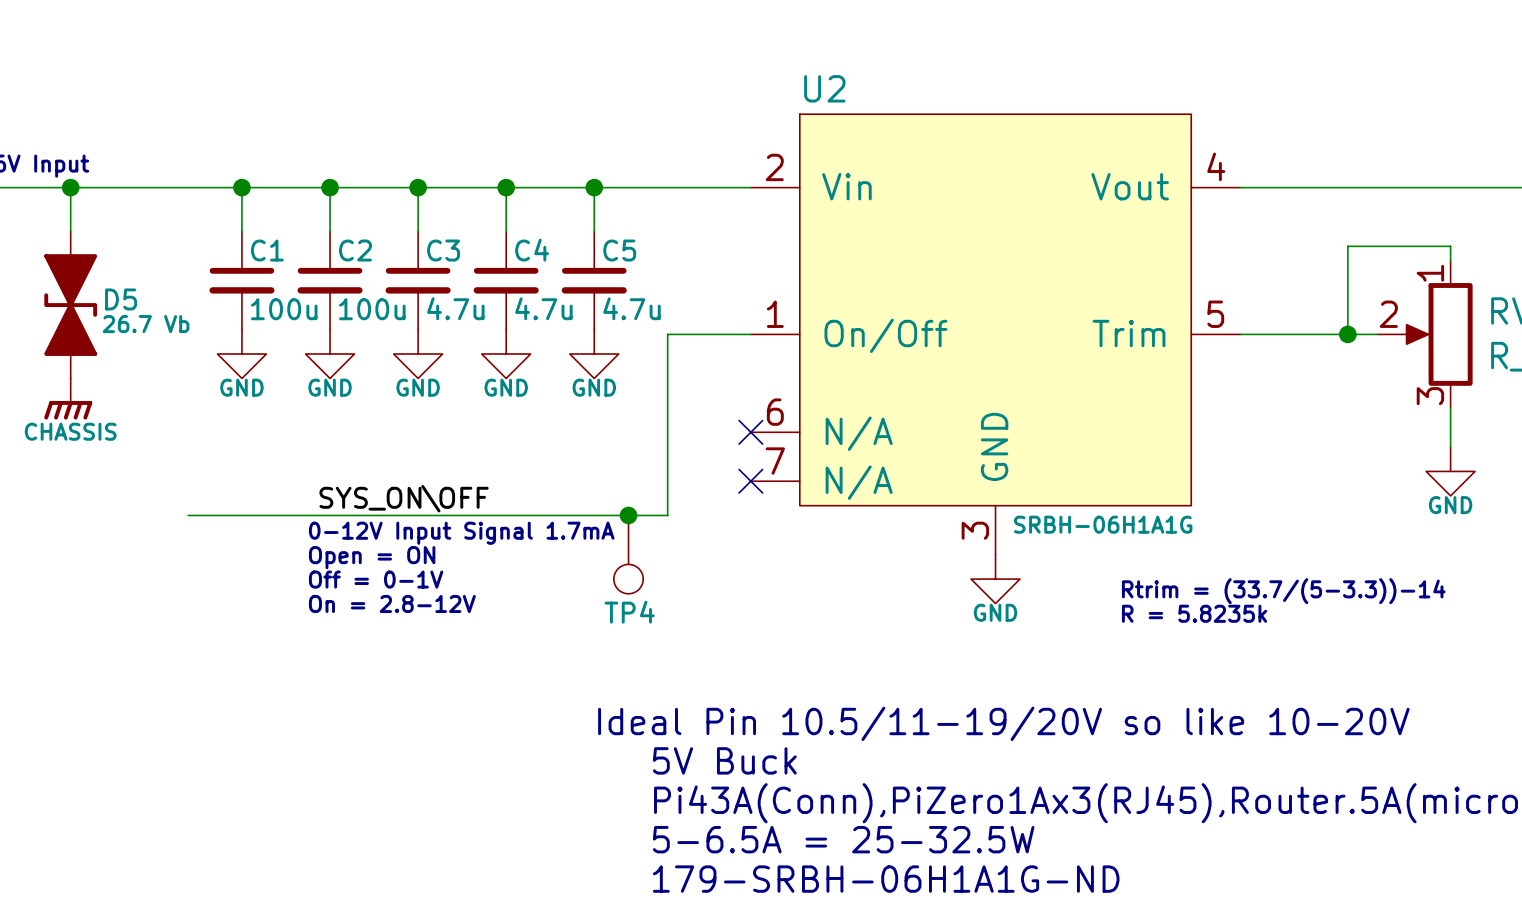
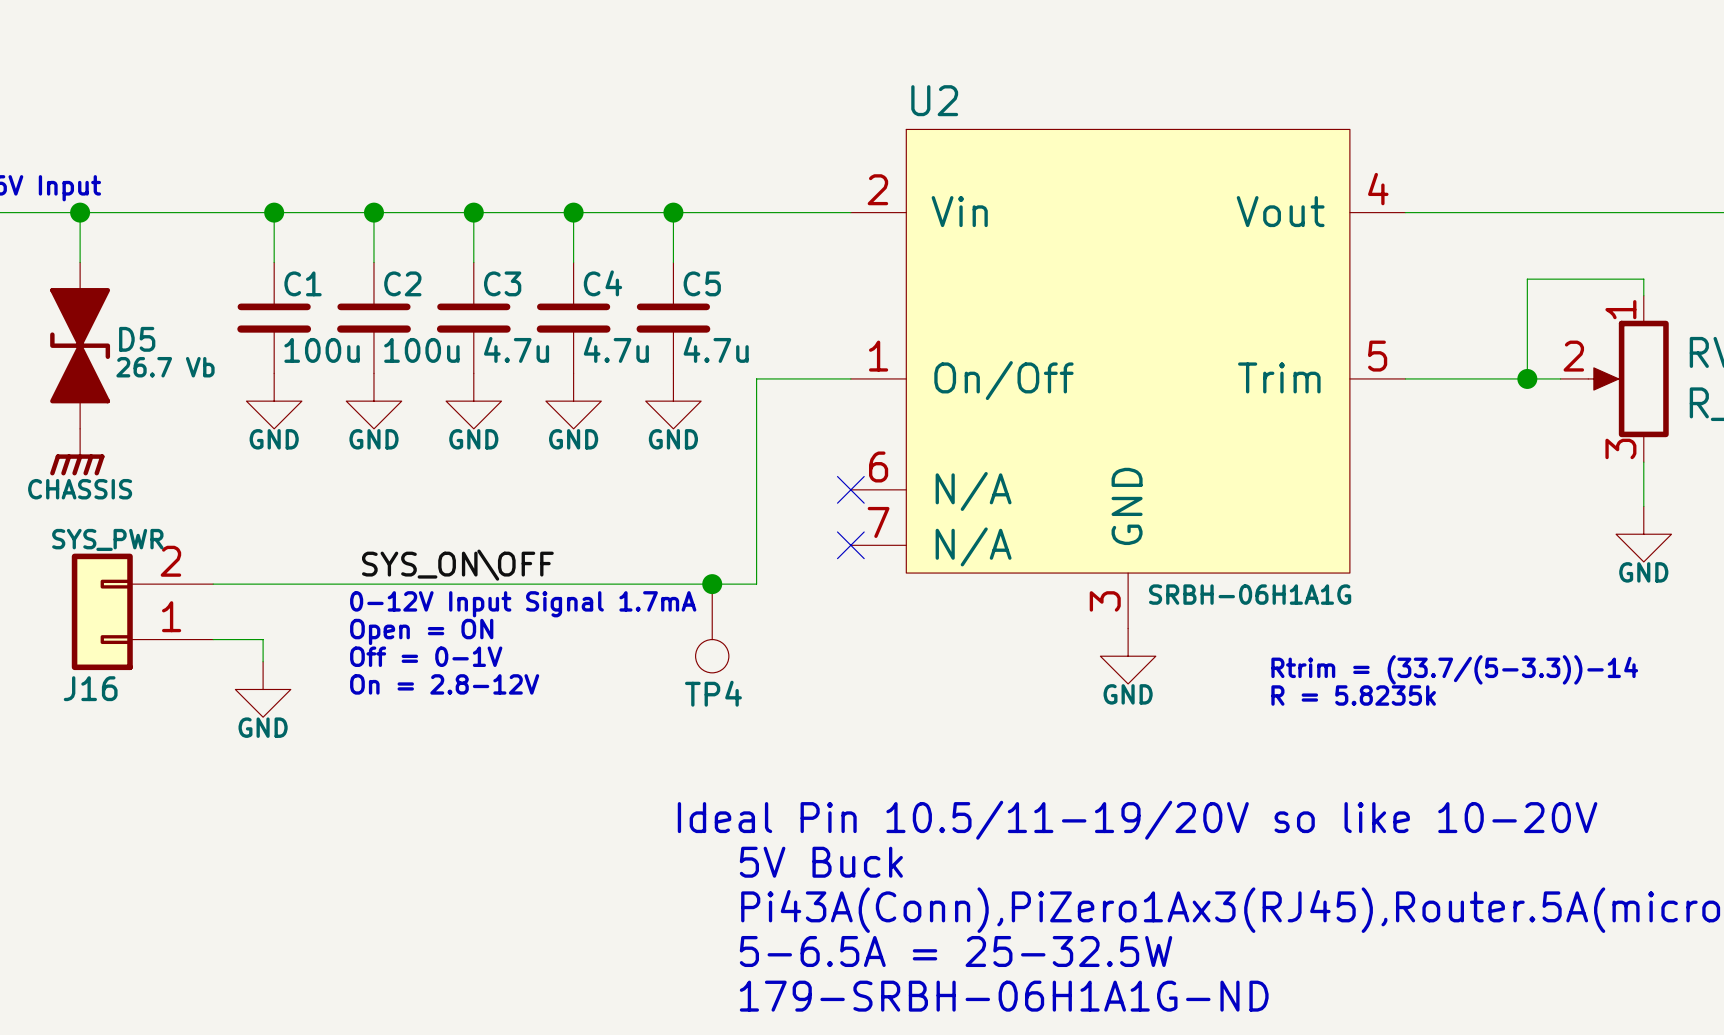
J16: none -> SYS_PWR (142, 611)
wire: none -> (213, 639) (263, 639) (263, 661)
power symbol: none -> GND (263, 689)

